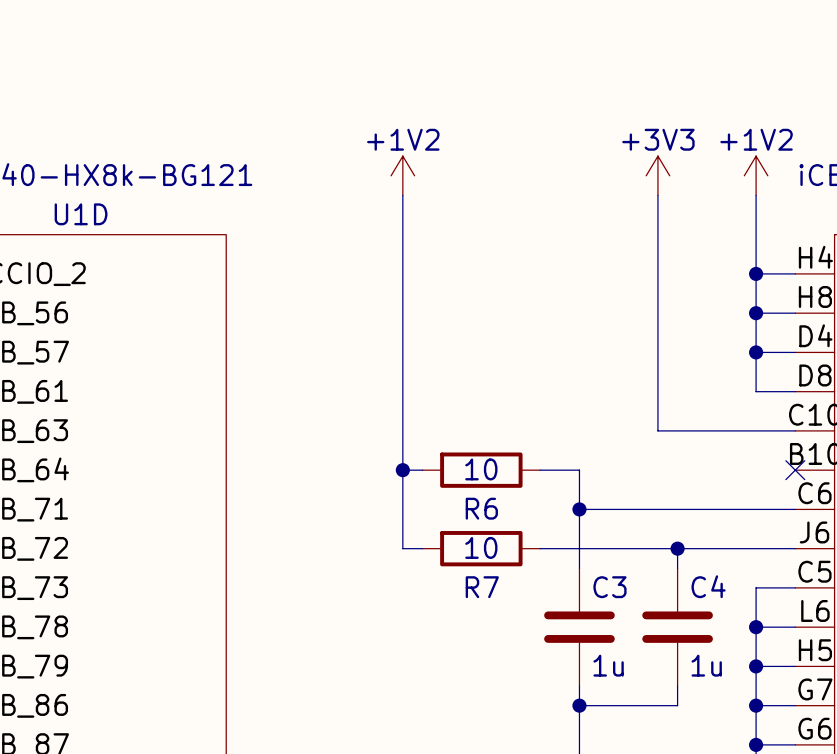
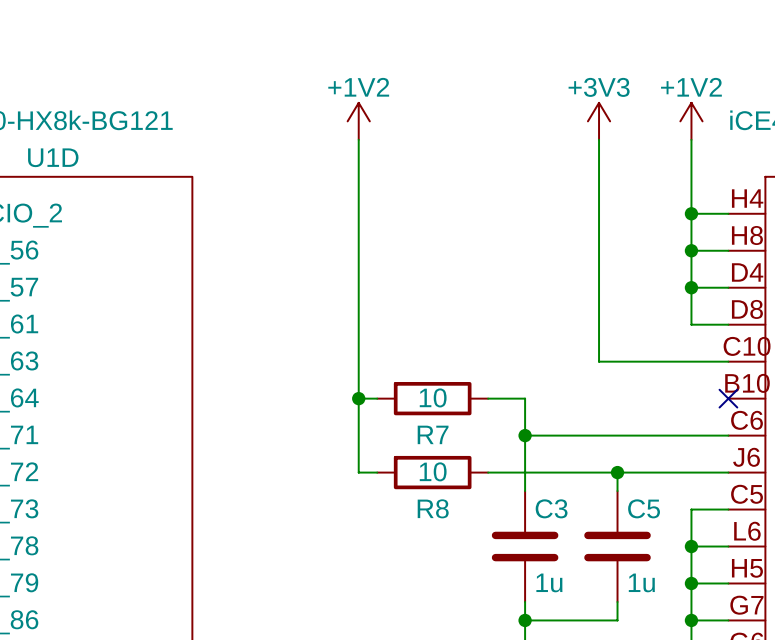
R6 name: R6 (481, 508) -> R7 (433, 434)
C4 name: C4 (708, 586) -> C5 (644, 508)
R7 name: R7 (482, 587) -> R8 (433, 508)

